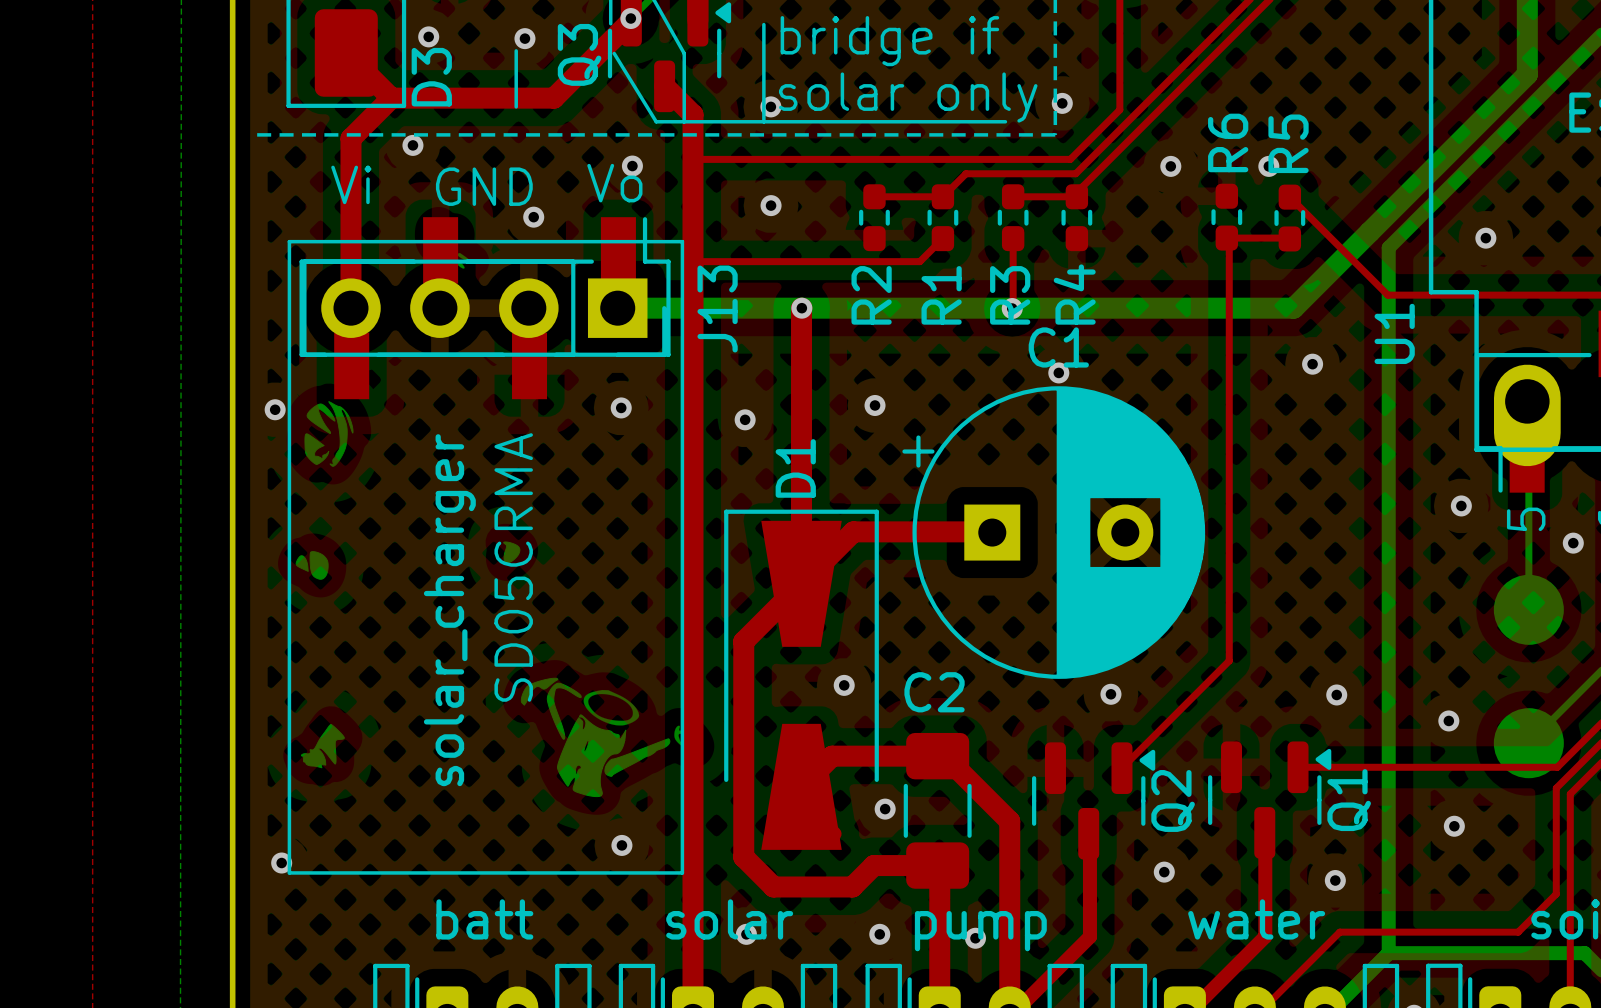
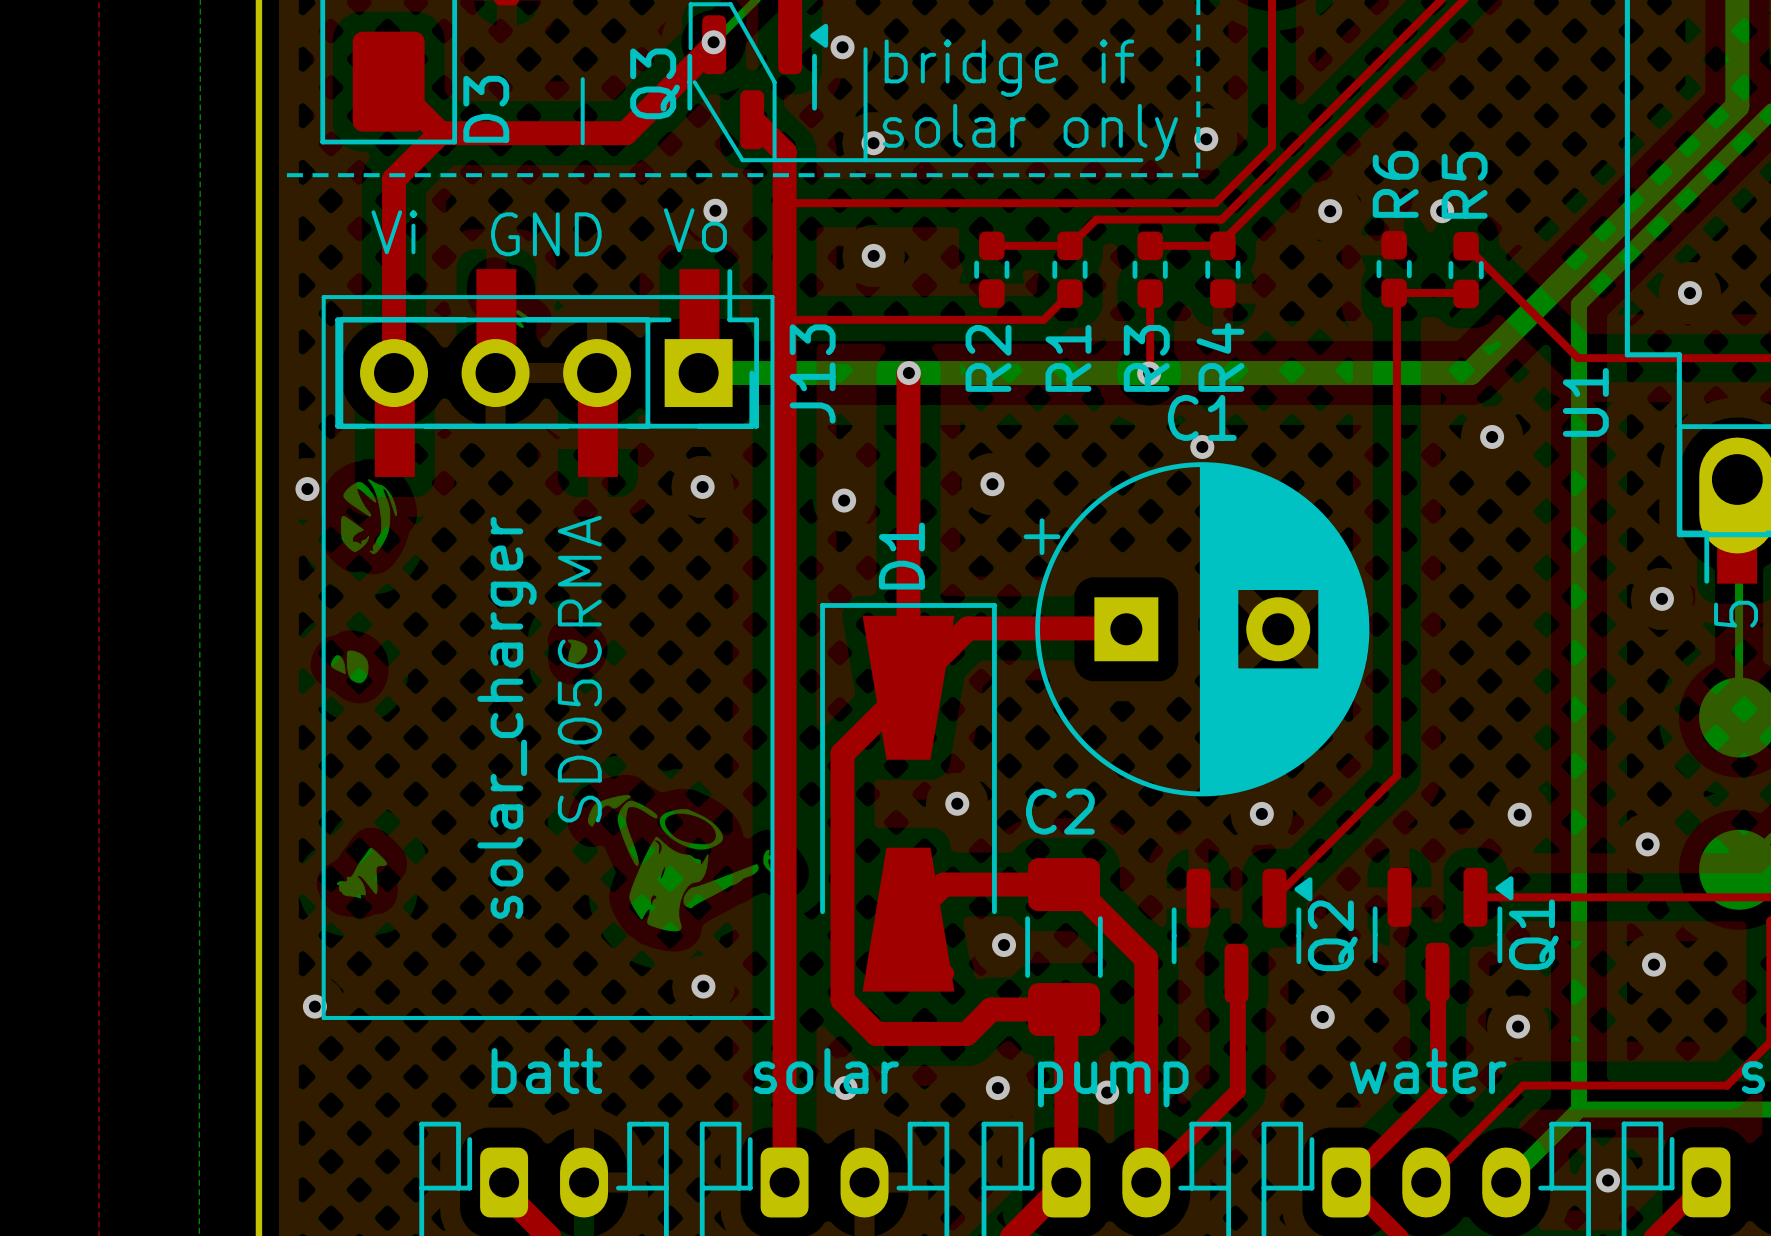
via: none -> (842, 47)
via: (428, 36) -> none
via: (524, 38) -> none
via: (412, 145) -> none
via: (533, 217) -> none

